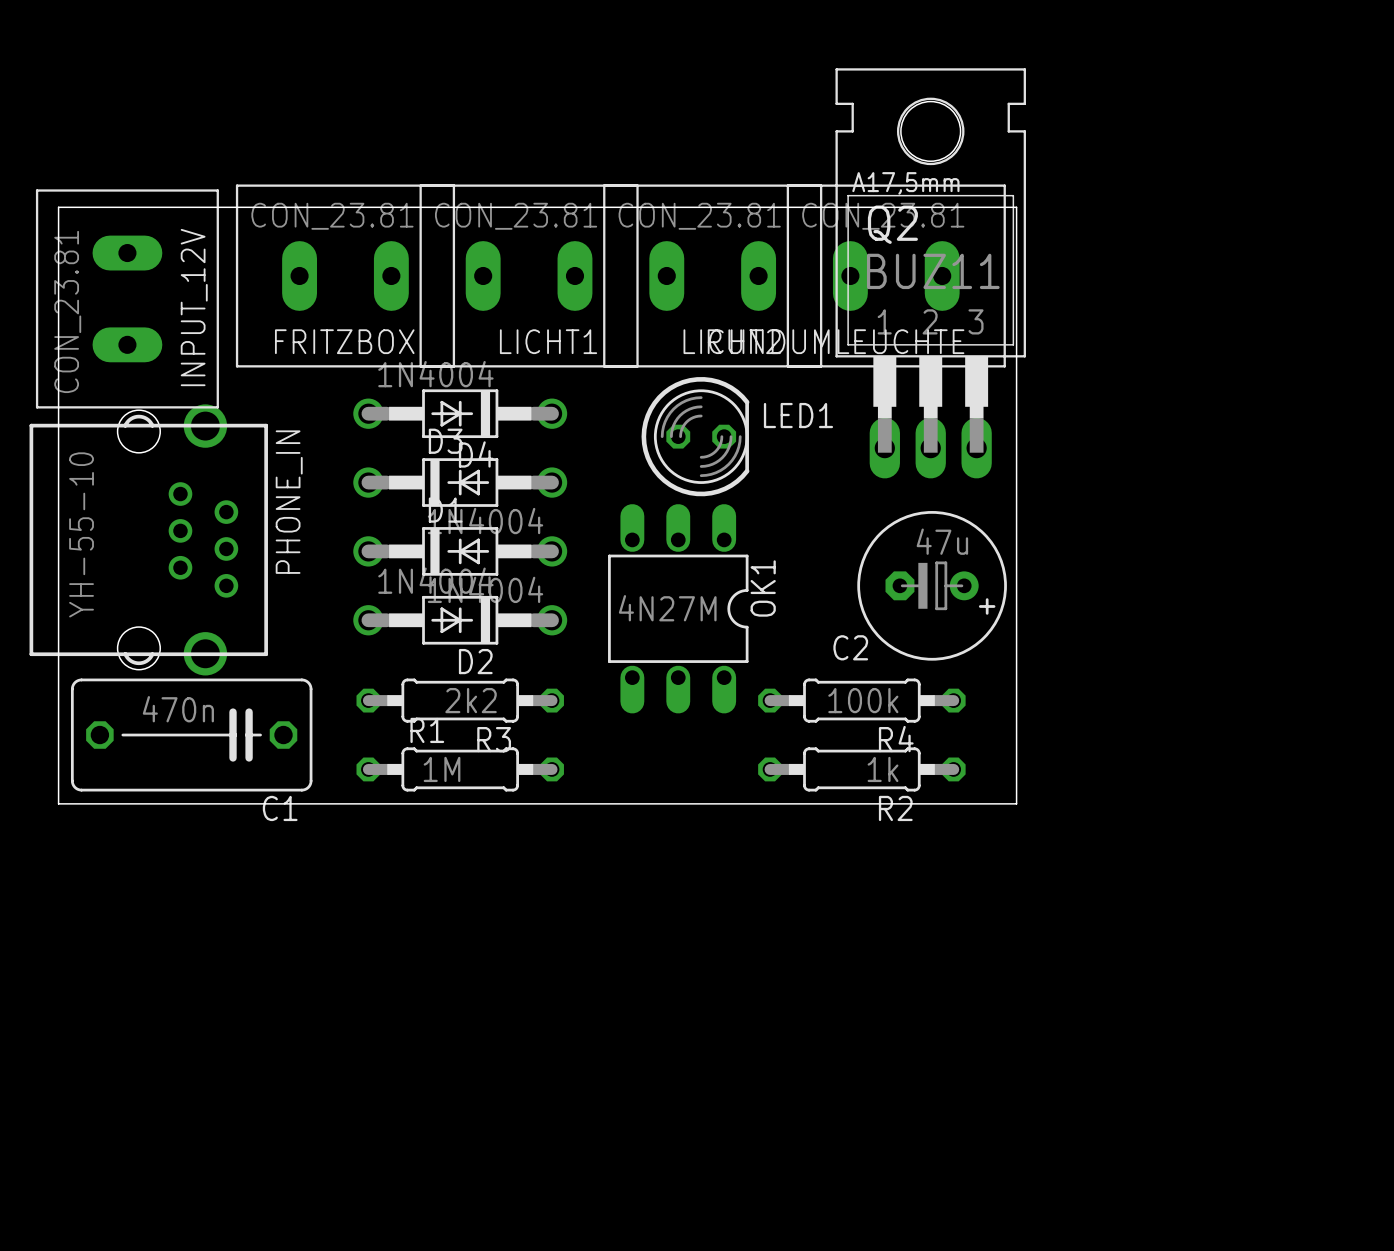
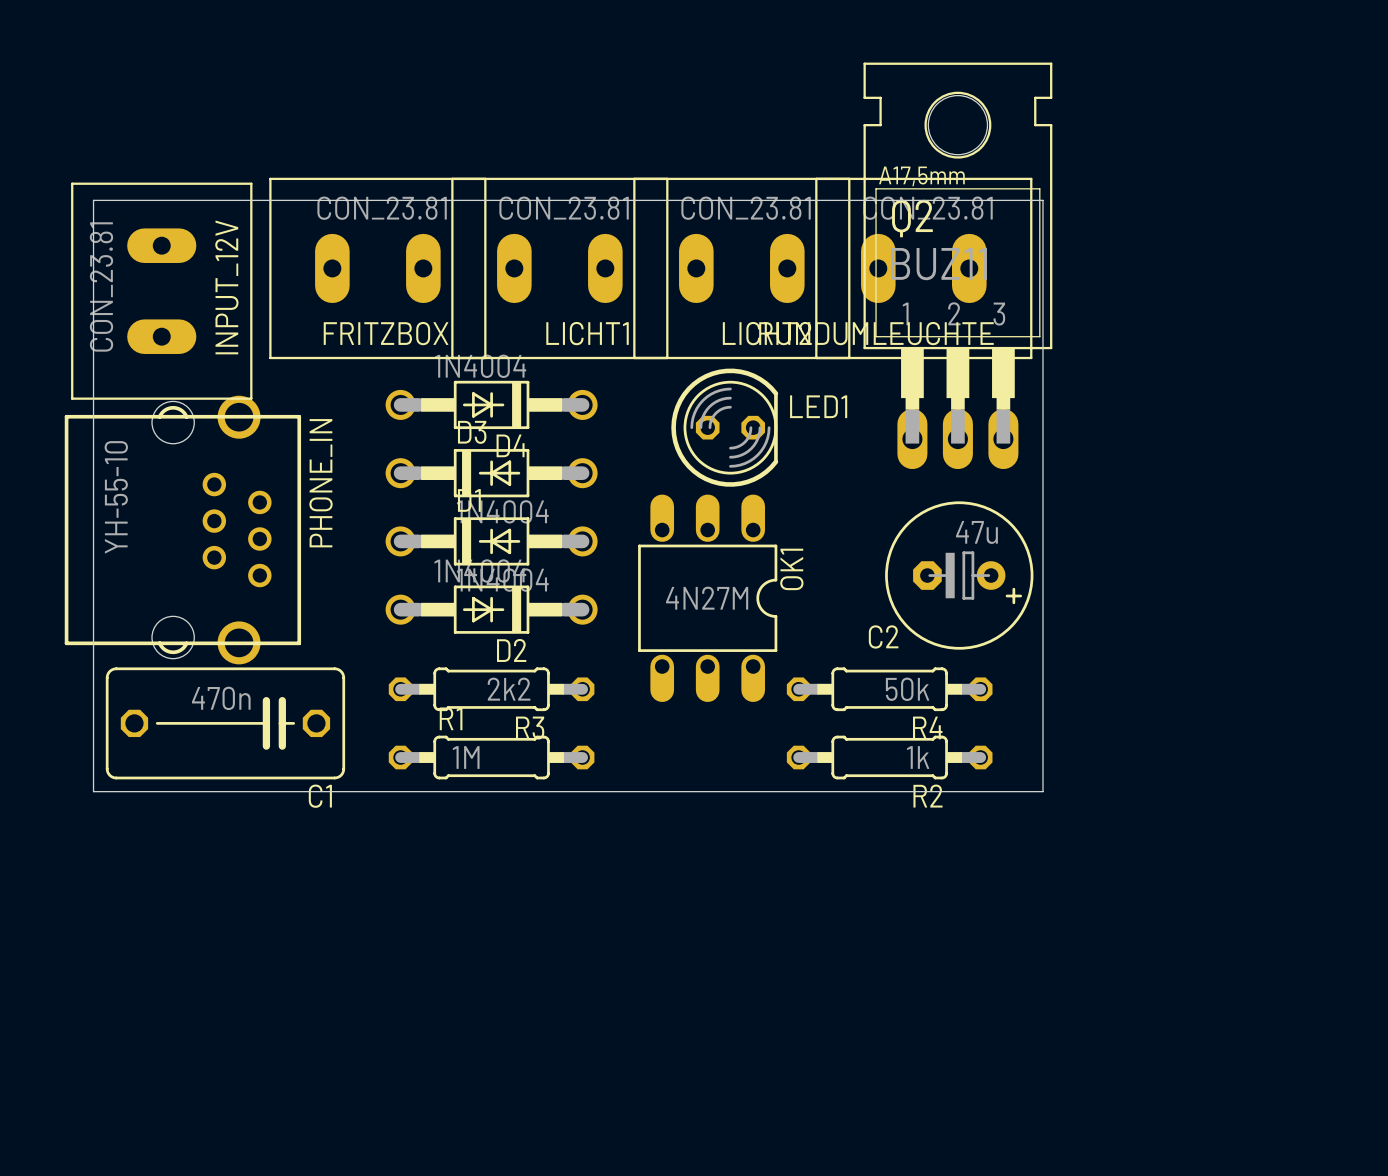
R4 value: 100k (863, 700) -> 50k (907, 689)

